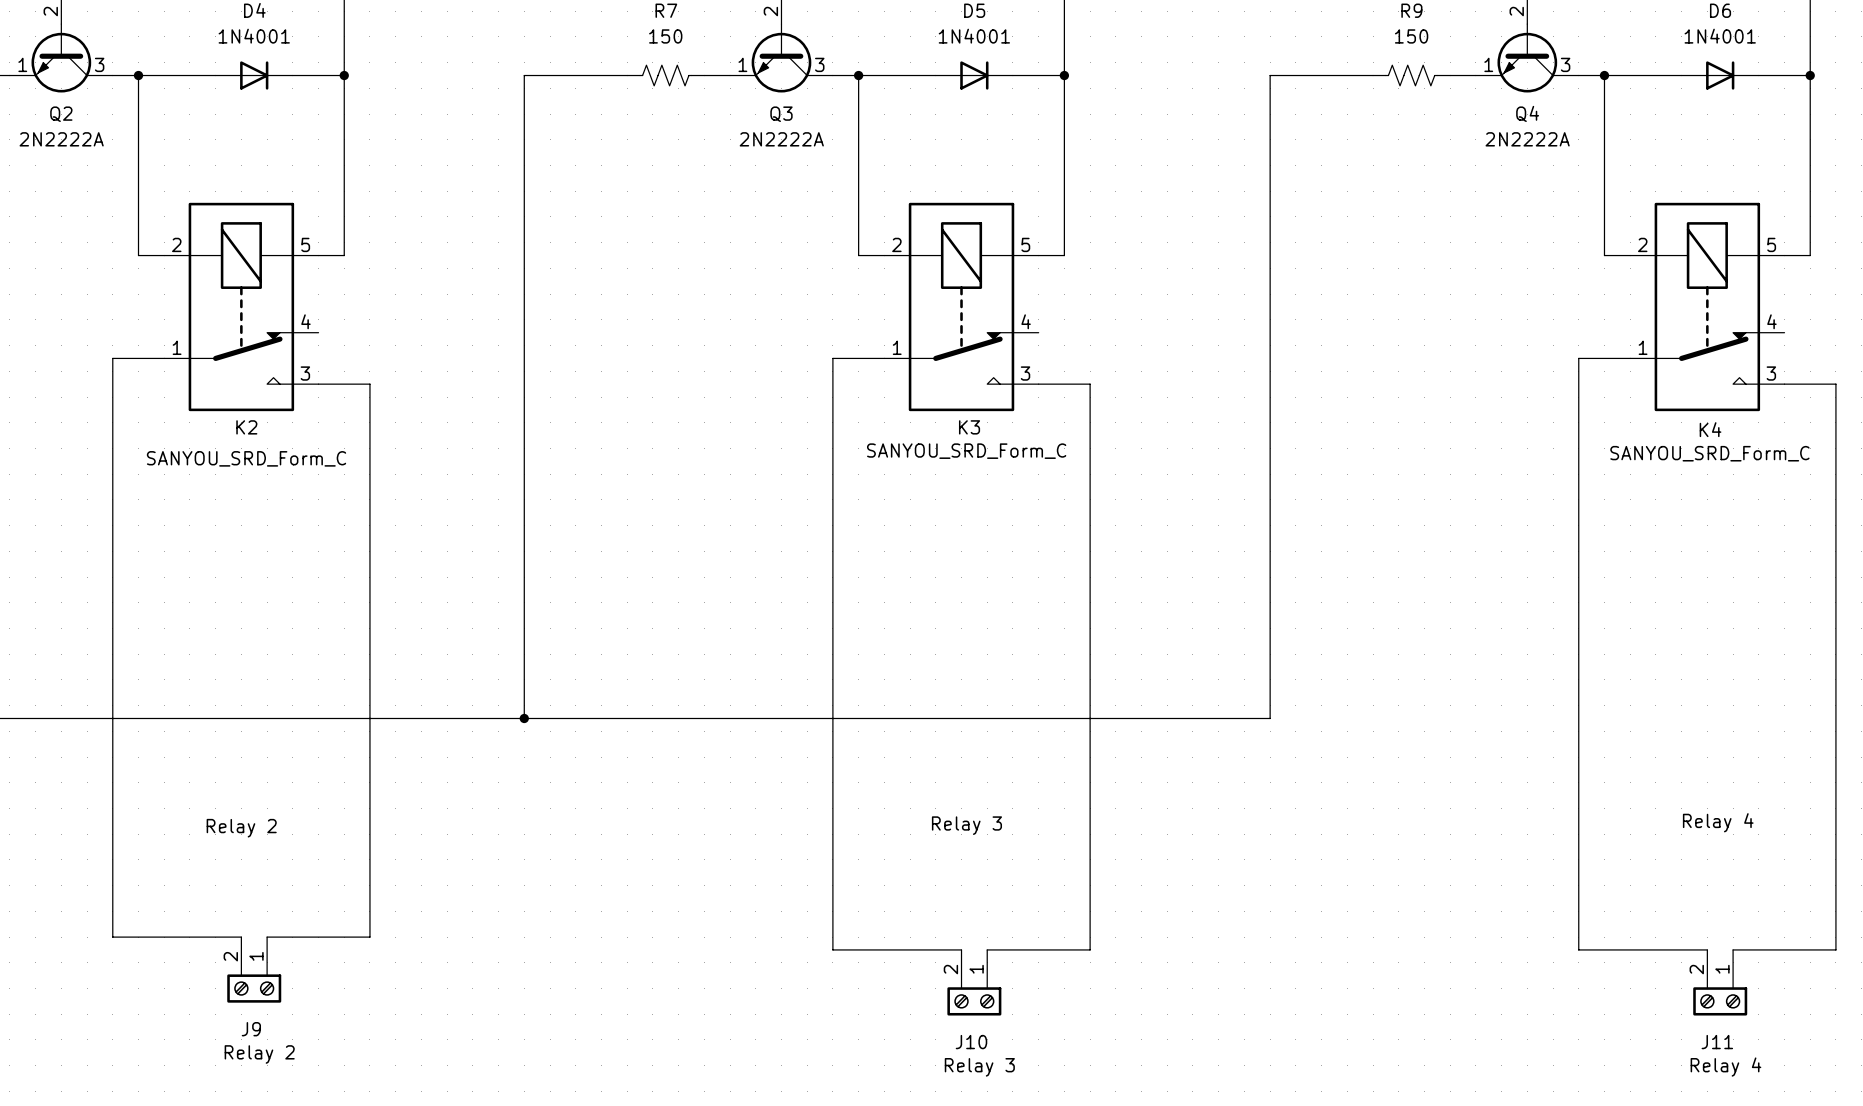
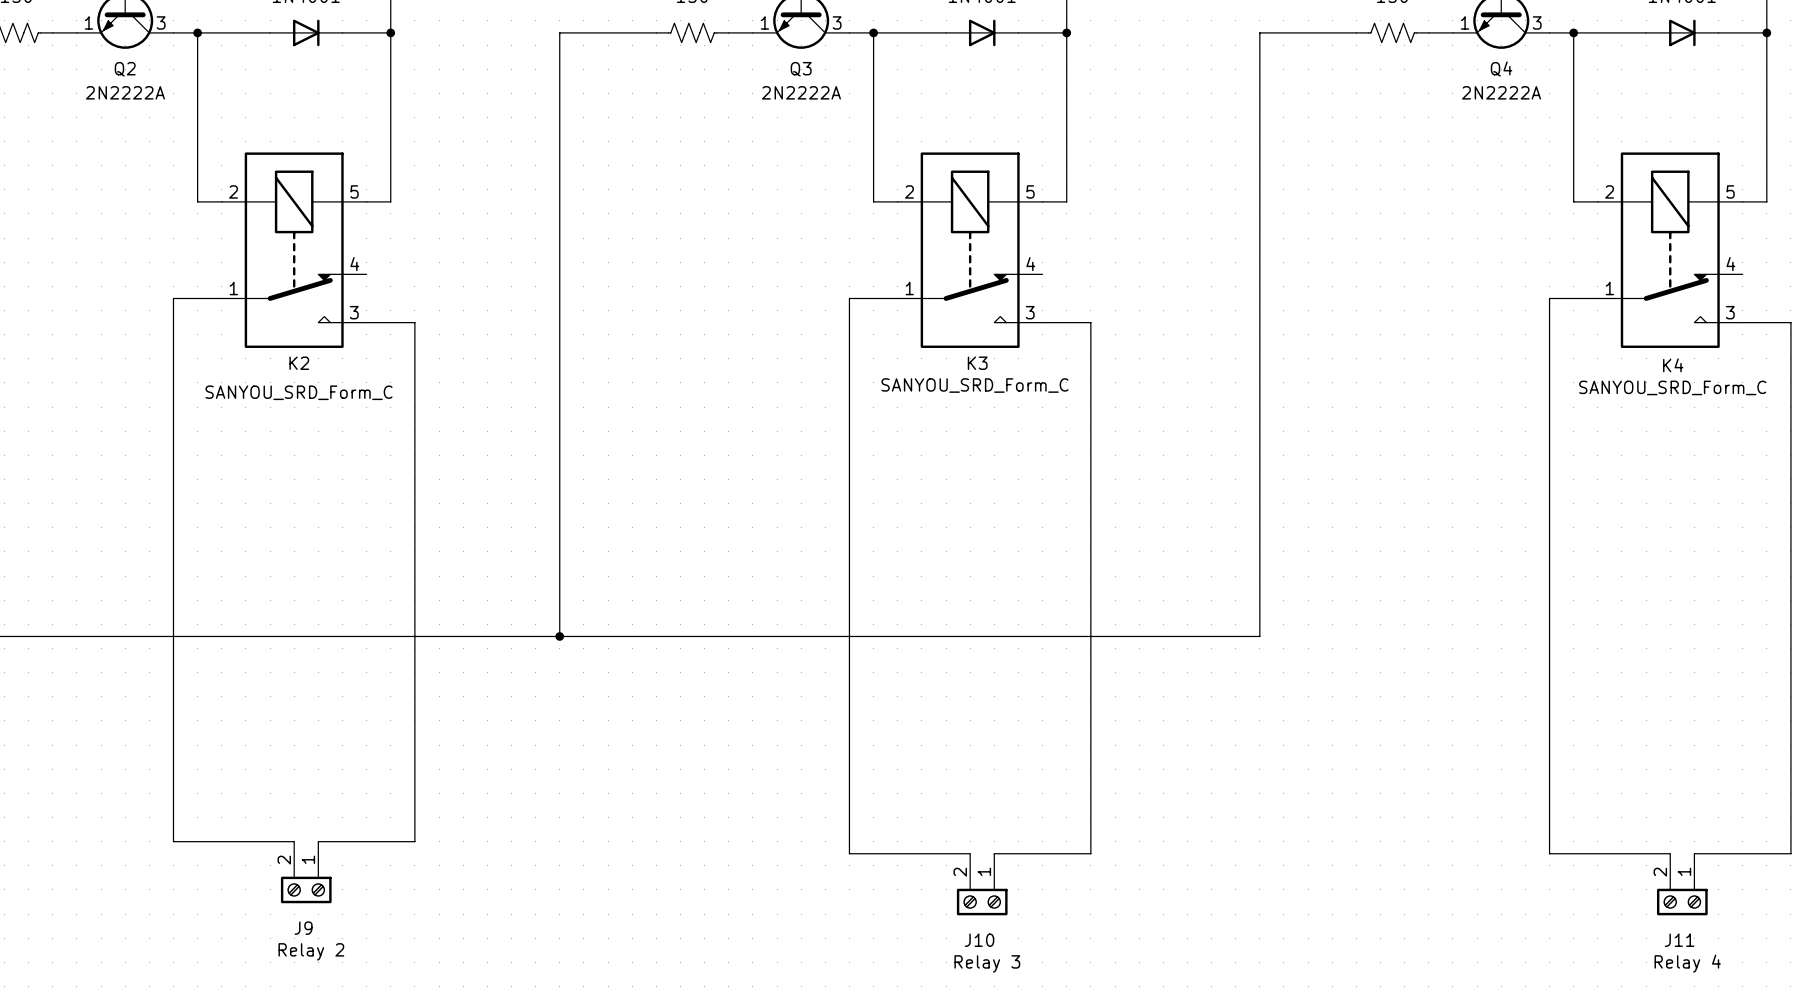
text: Relay 4 (1718, 822) -> none
text: Relay 3 (966, 825) -> none
text: Relay 2 (241, 828) -> none

